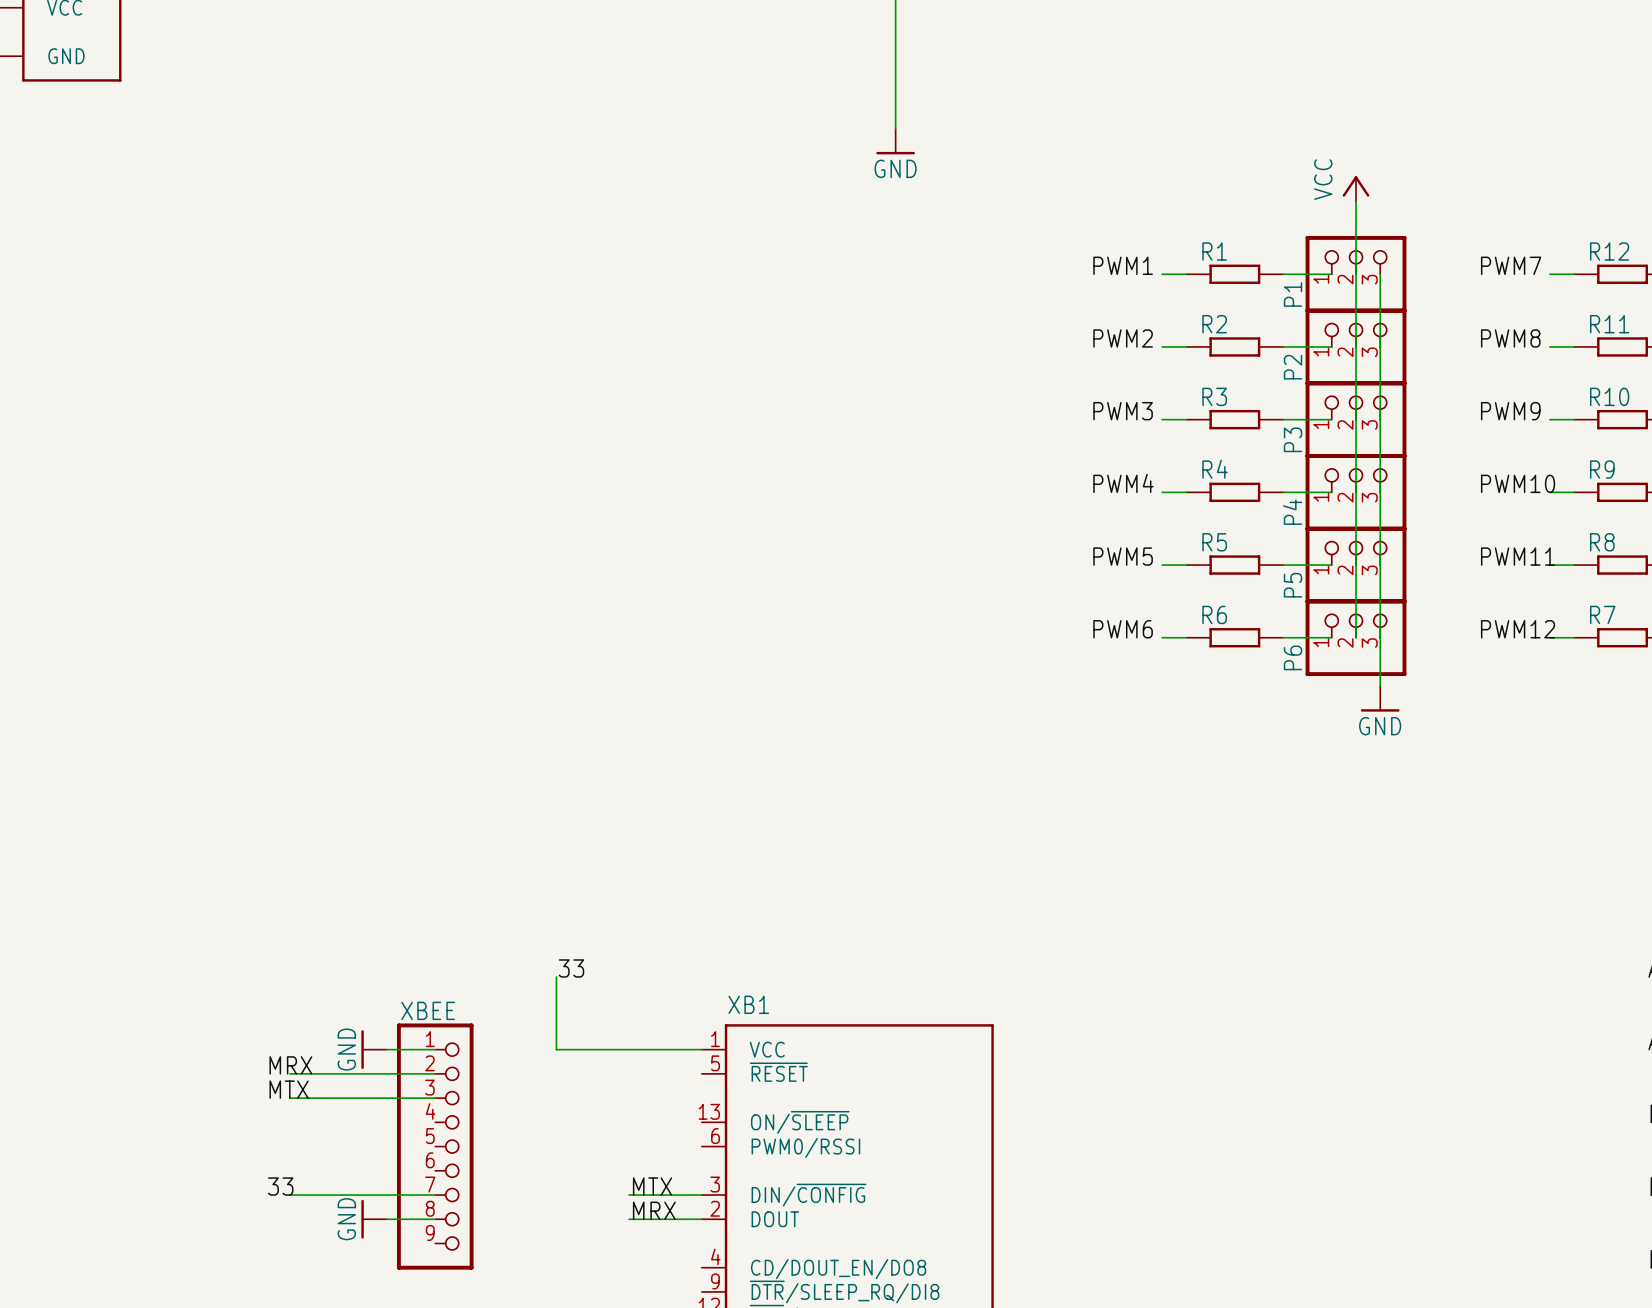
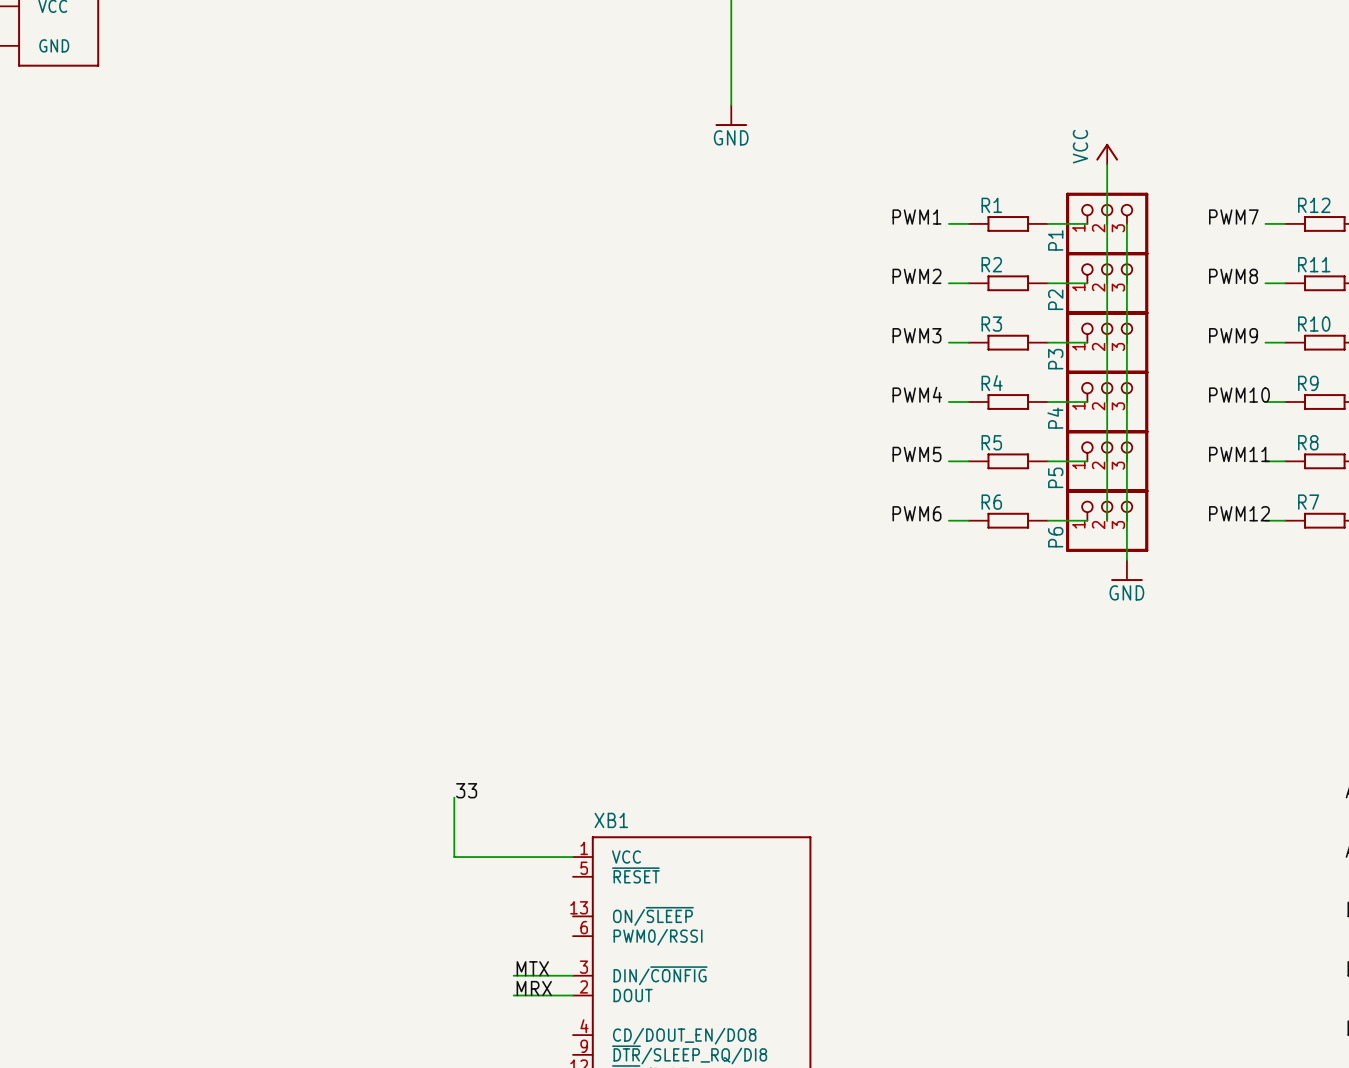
power symbol: GND (374, 1049) -> none
wire: (386, 1049) (435, 1049) -> none
label: MRX (290, 1065) -> none
wire: (289, 1073) (435, 1073) -> none
label: MTX (289, 1089) -> none
wire: (289, 1098) (435, 1098) -> none
XBEE: (435, 1146) -> none
label: 33 (280, 1186) -> none
wire: (289, 1195) (435, 1195) -> none
power symbol: GND (374, 1219) -> none
wire: (386, 1219) (435, 1219) -> none

